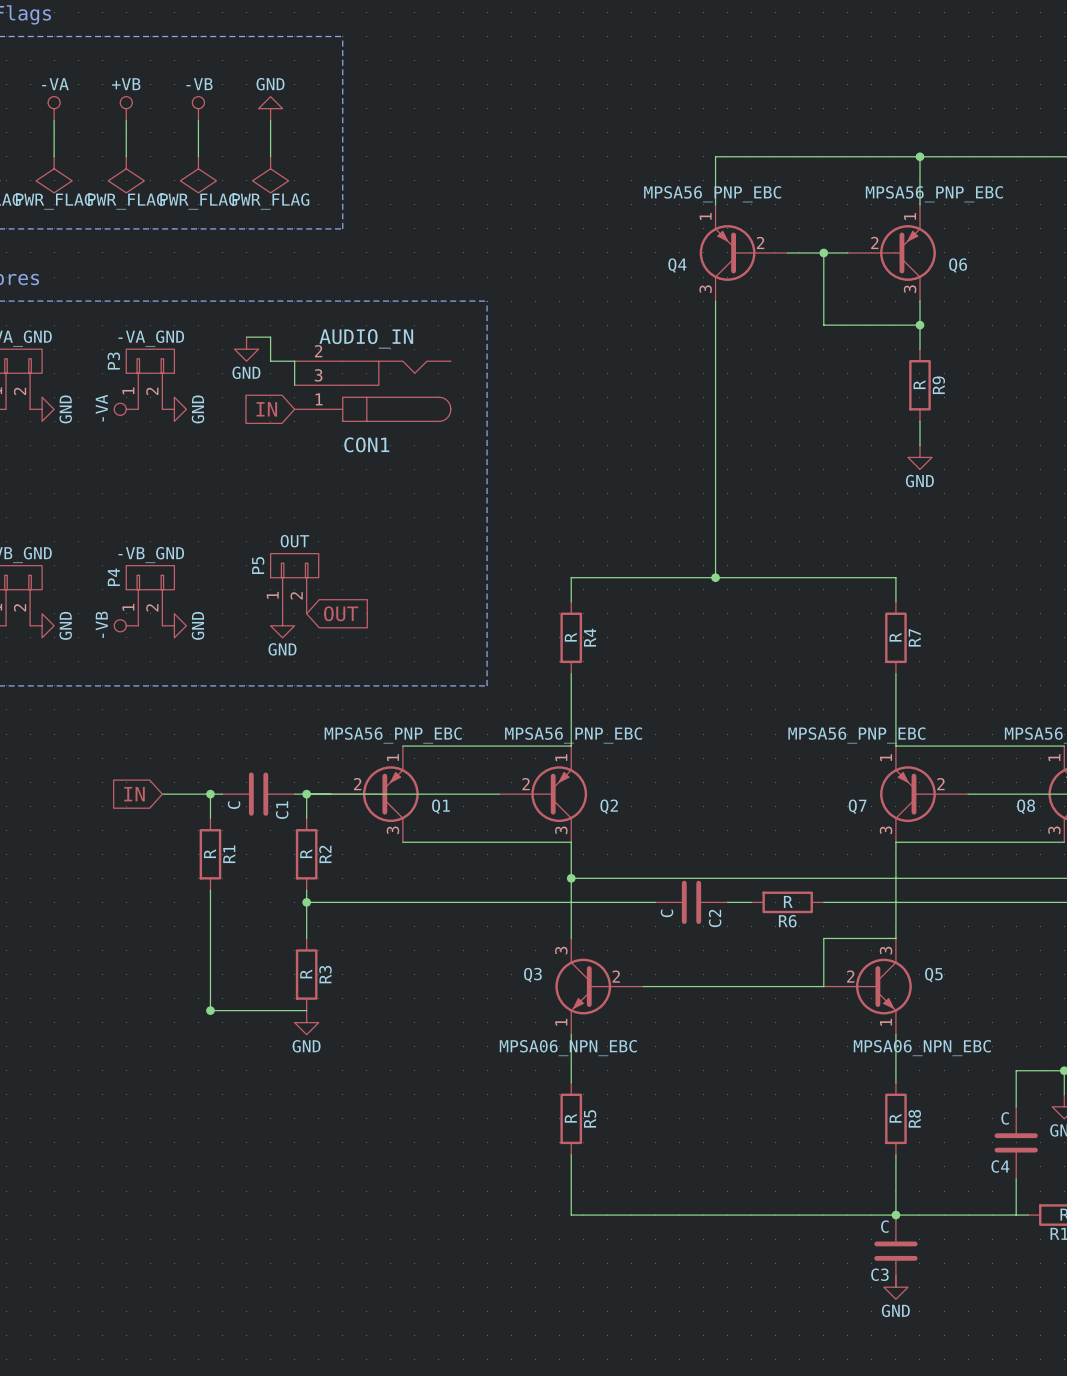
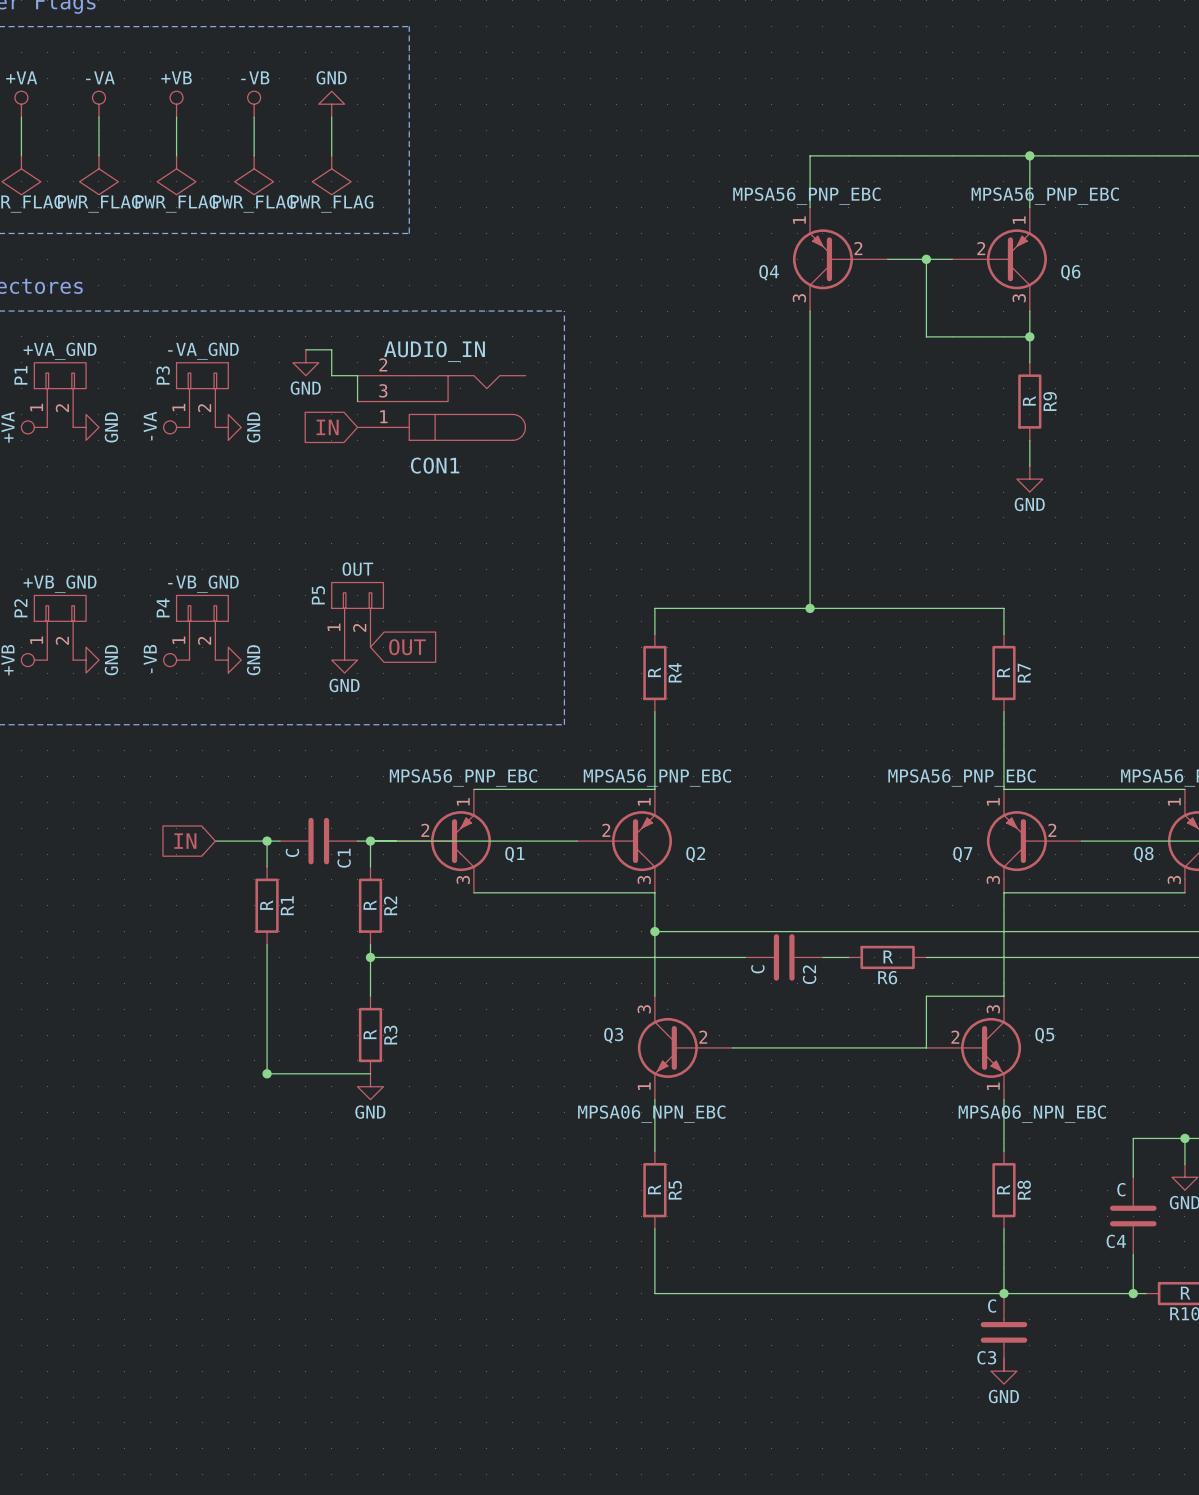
junction: none -> (1133, 1293)

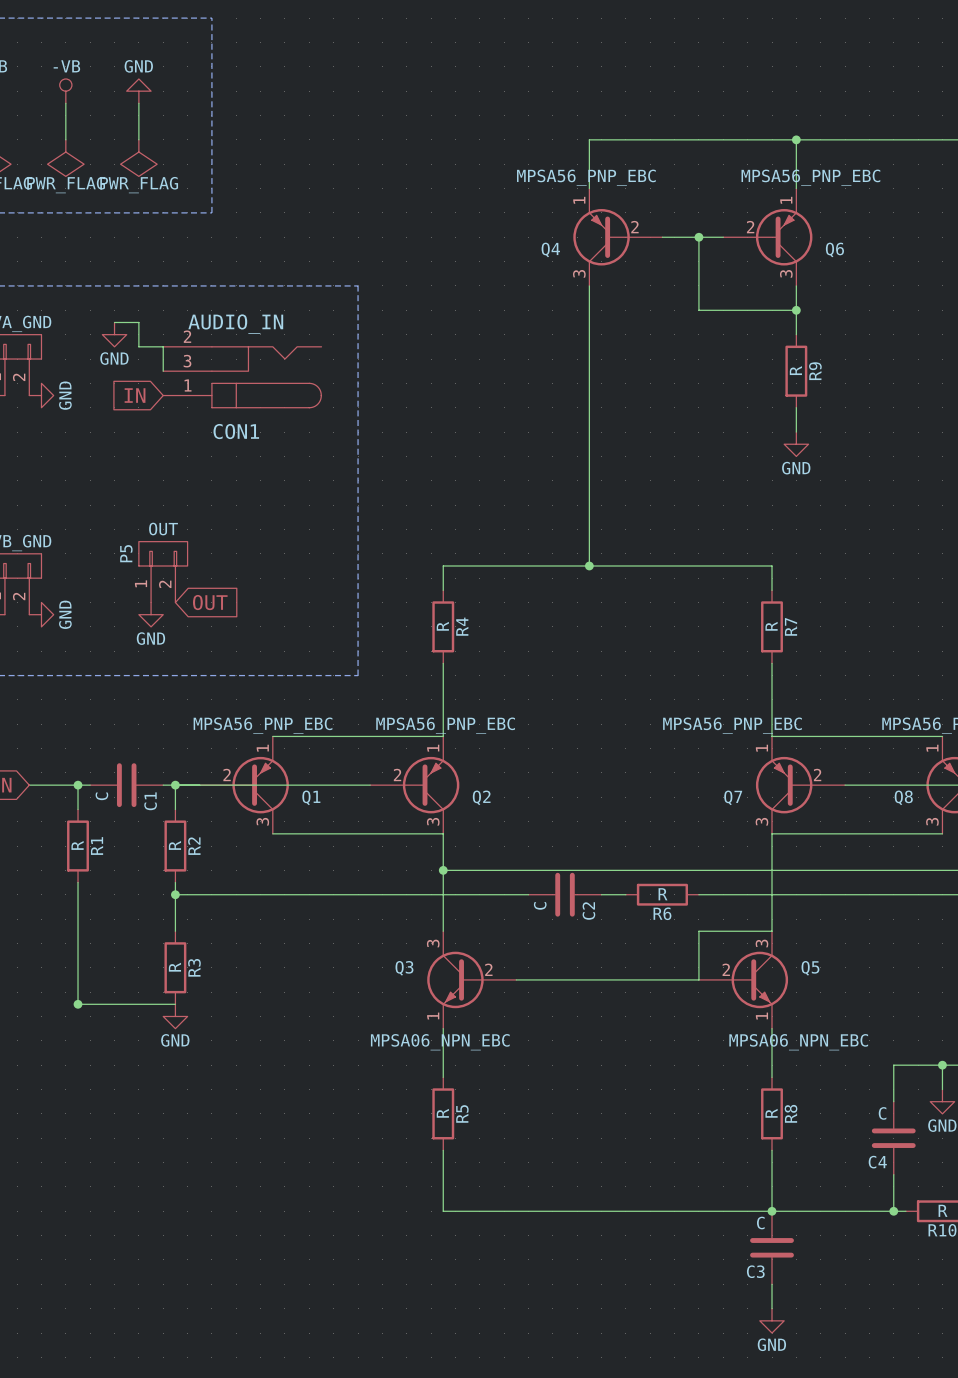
wire: none -> (772, 1284) (772, 1308)
power symbol position: GND (1003, 1371) -> GND (772, 1320)

